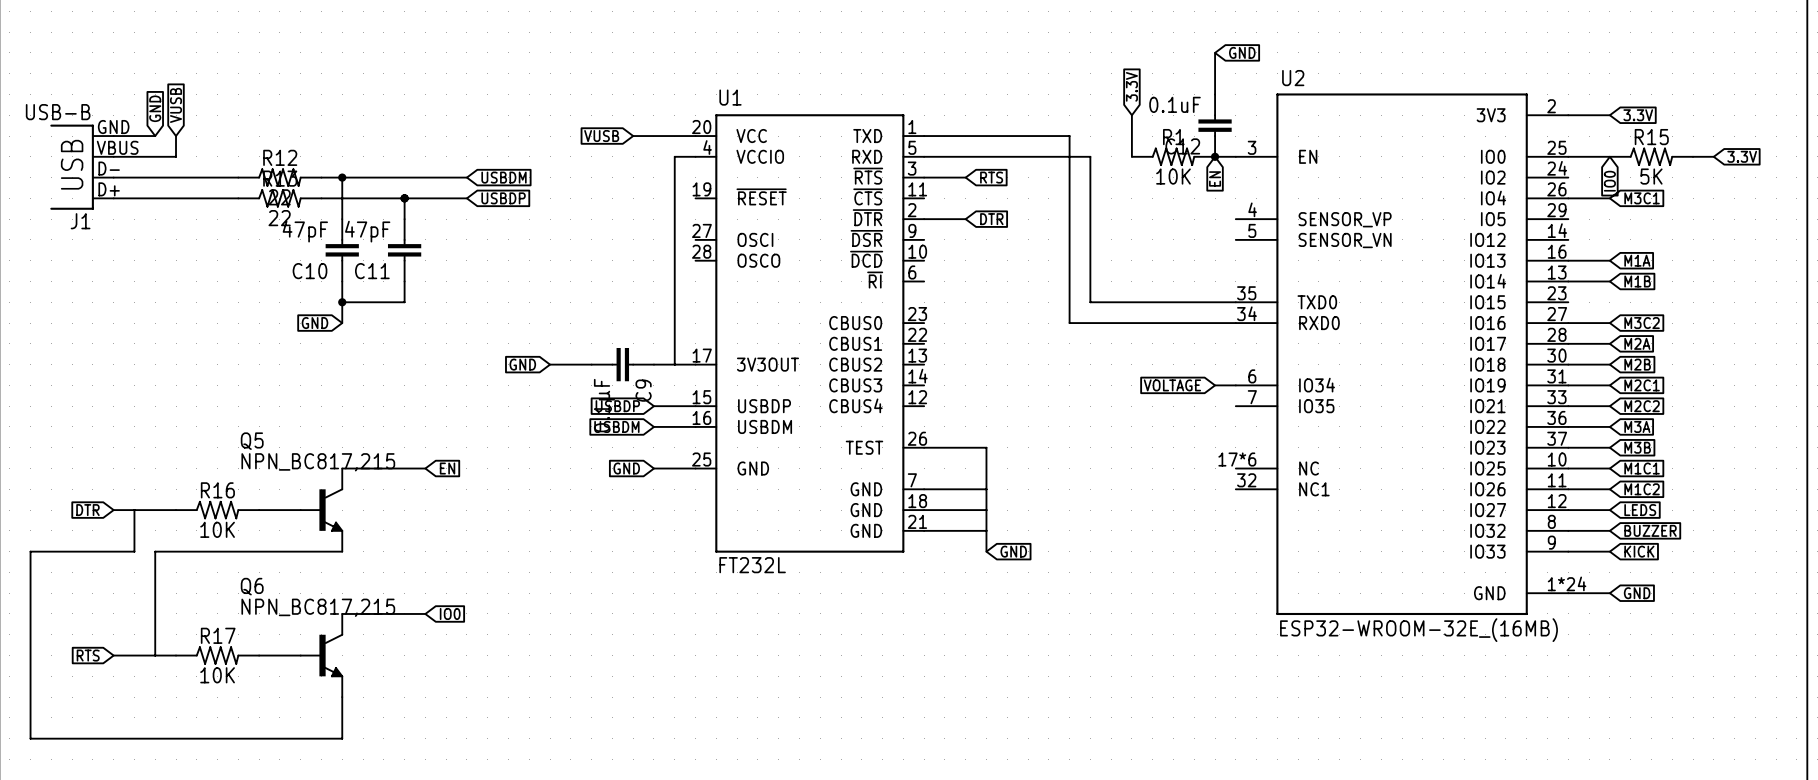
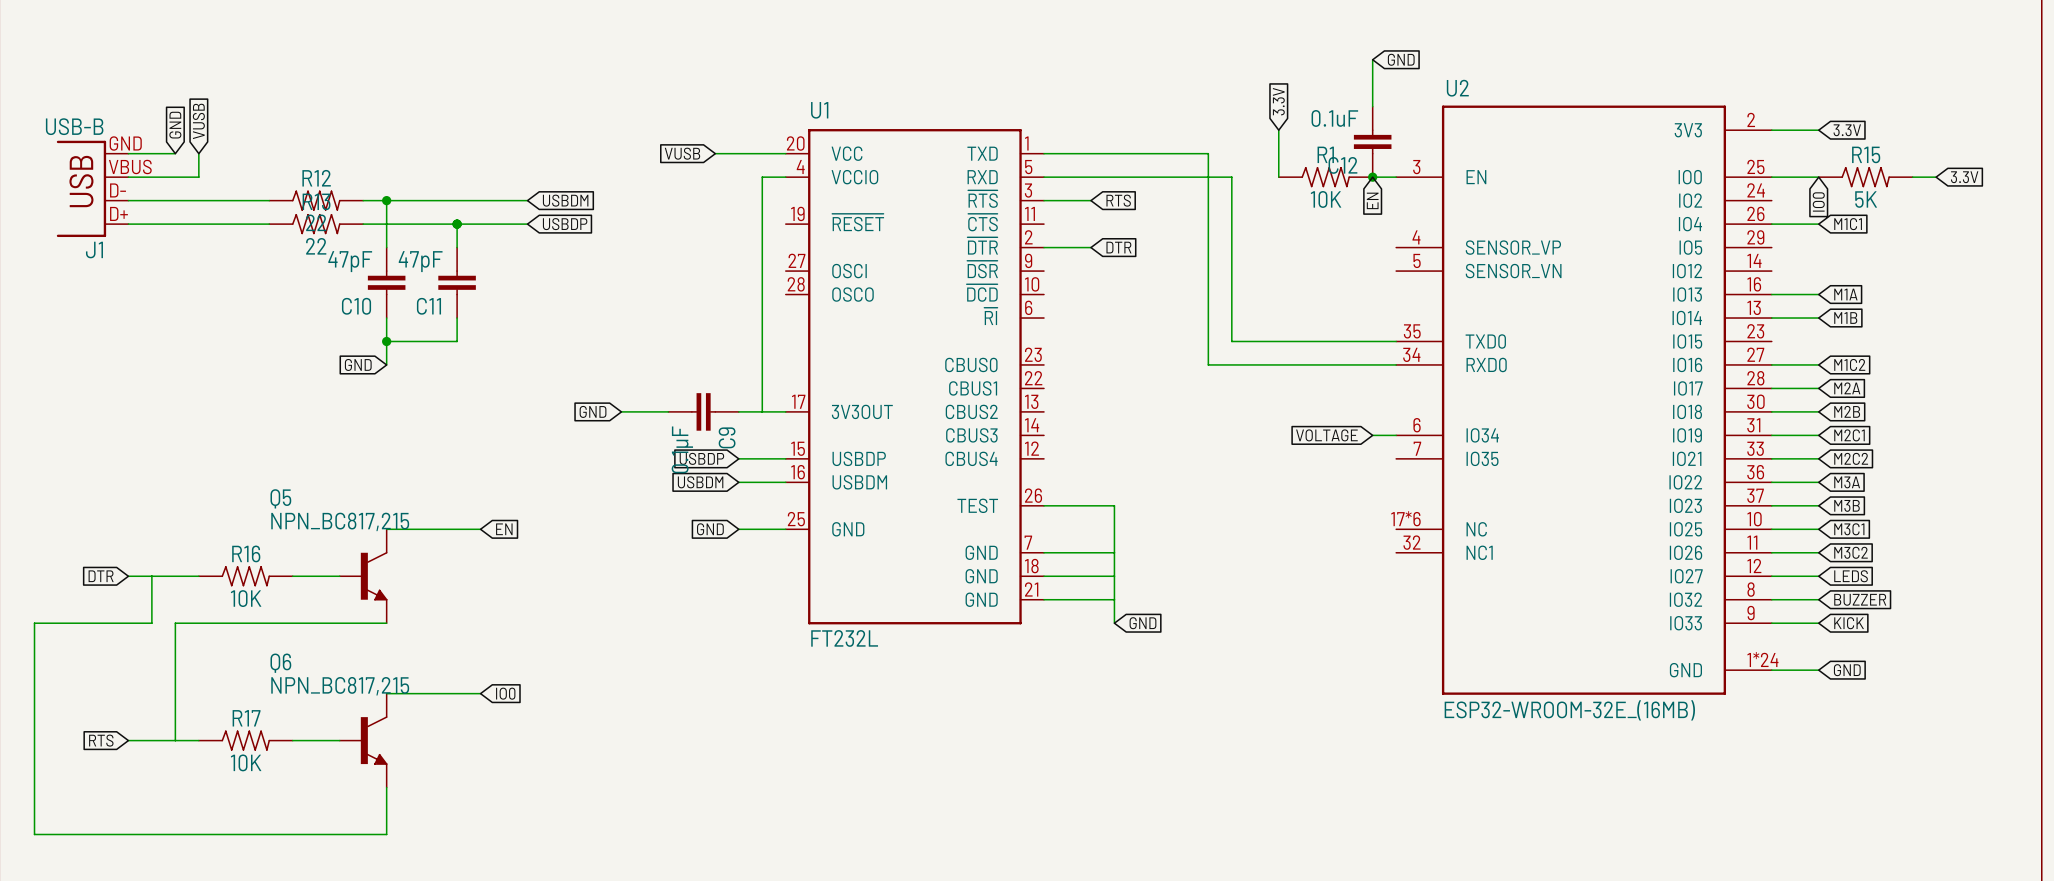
global label: M3C1 (1642, 198) -> M1C1 (1848, 224)
global label: M3C2 (1642, 323) -> M1C2 (1849, 364)
global label: M1C1 (1642, 468) -> M3C1 (1849, 529)
global label: M1C2 (1642, 489) -> M3C2 (1851, 552)

